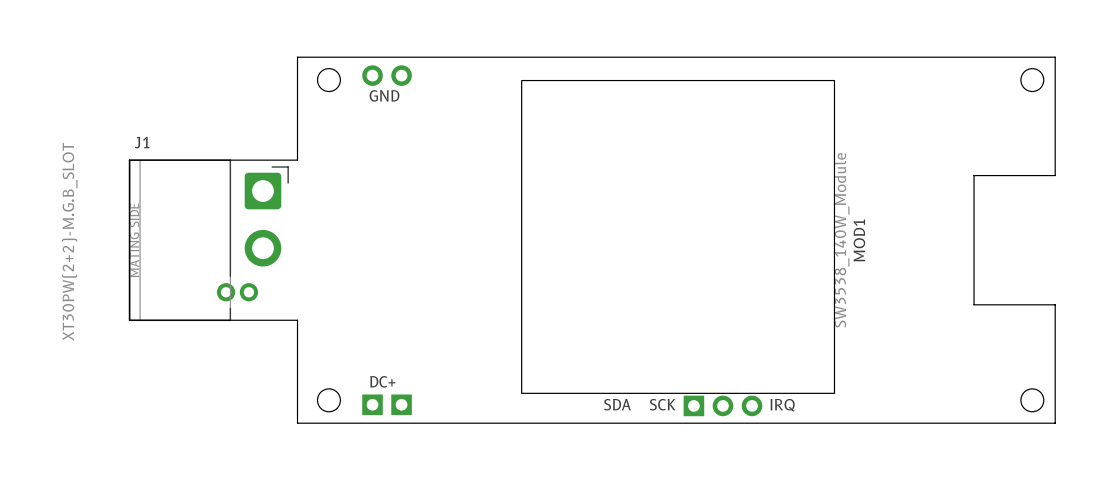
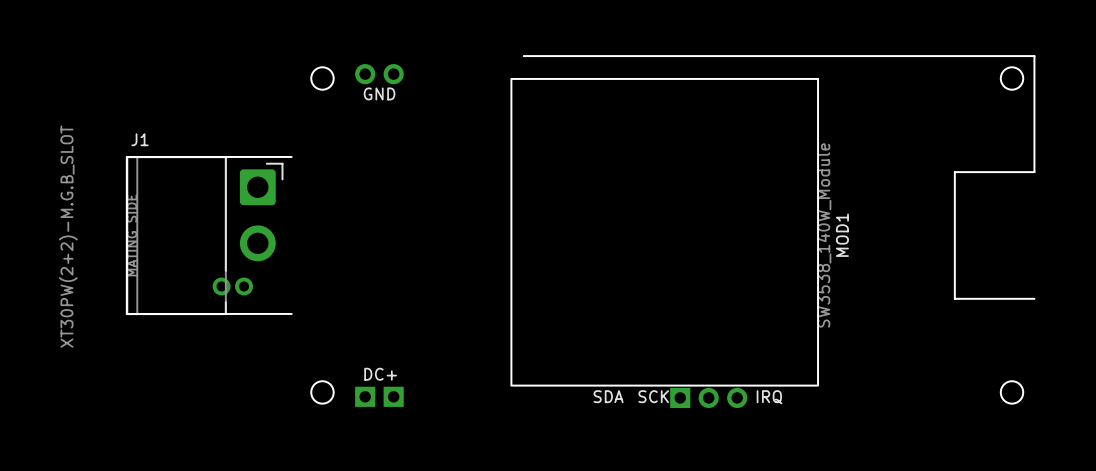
board edge: (534, 57) (297, 57) (297, 160) -> none
board edge: (1055, 304) (1055, 423) (297, 423) (297, 320) -> none

